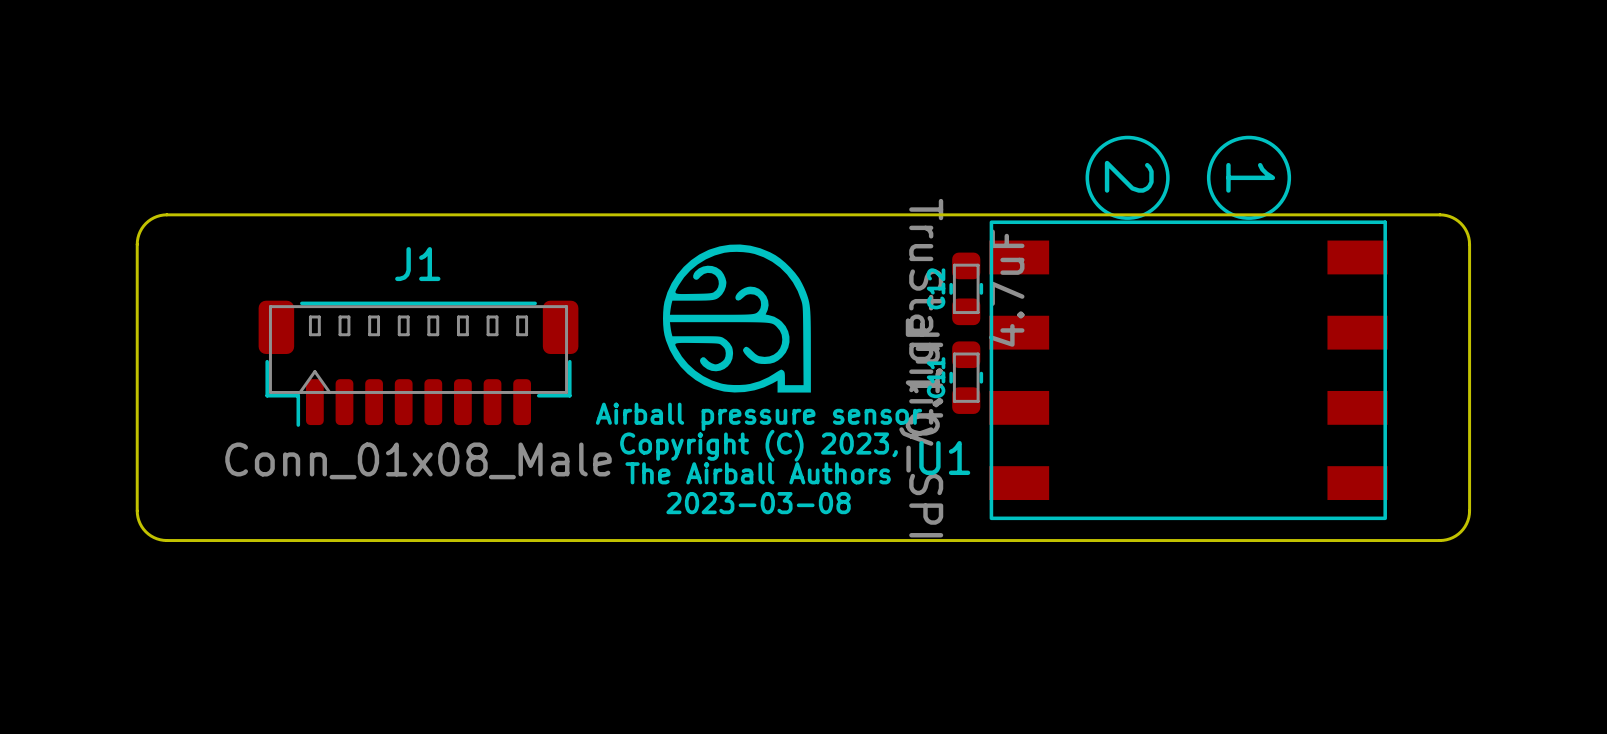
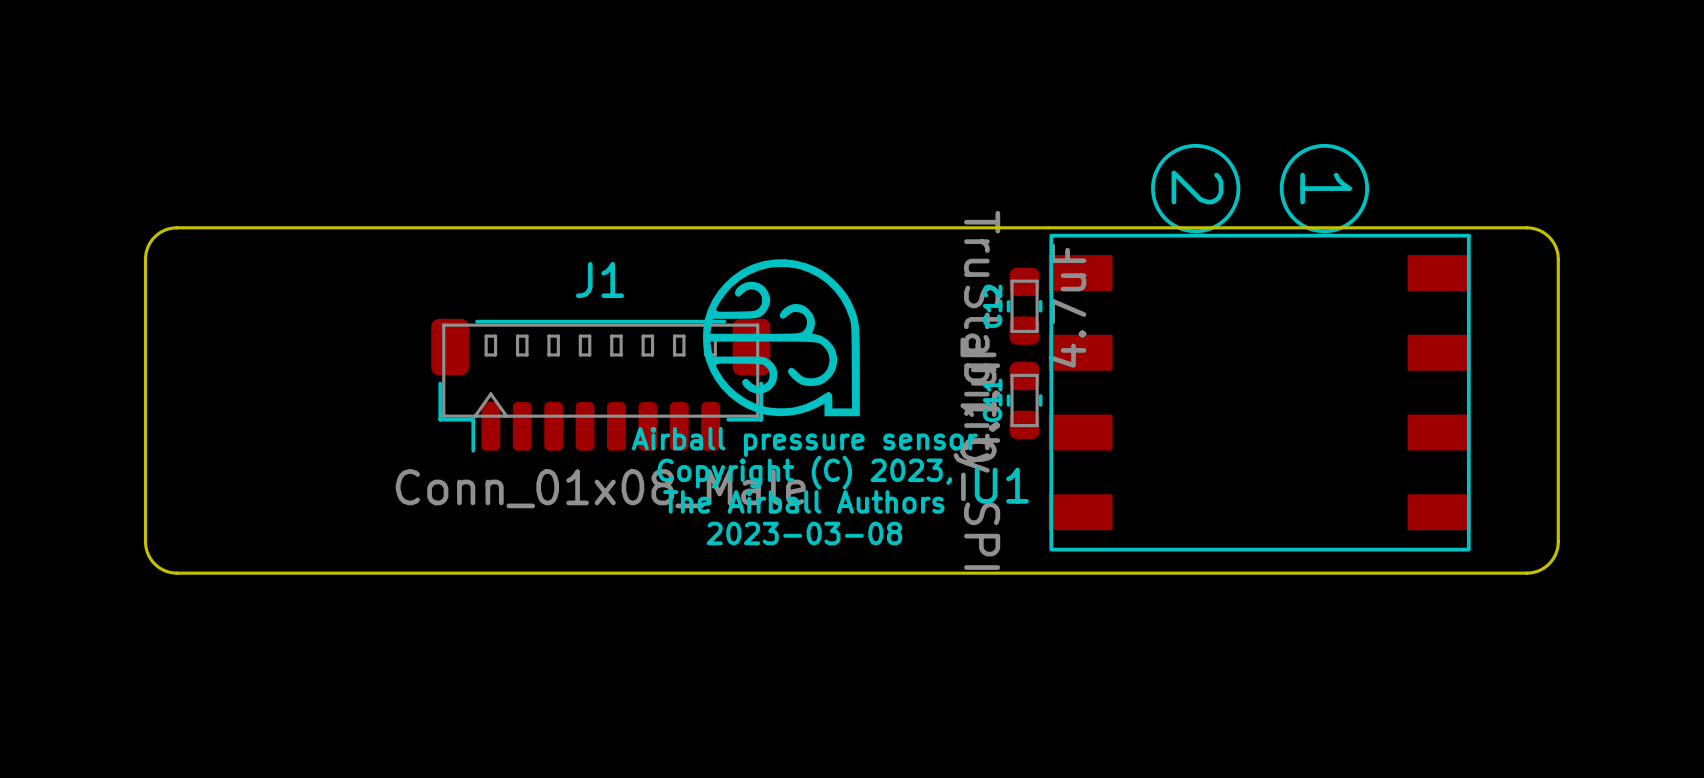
J1 position: (418, 363) -> (600, 385)

